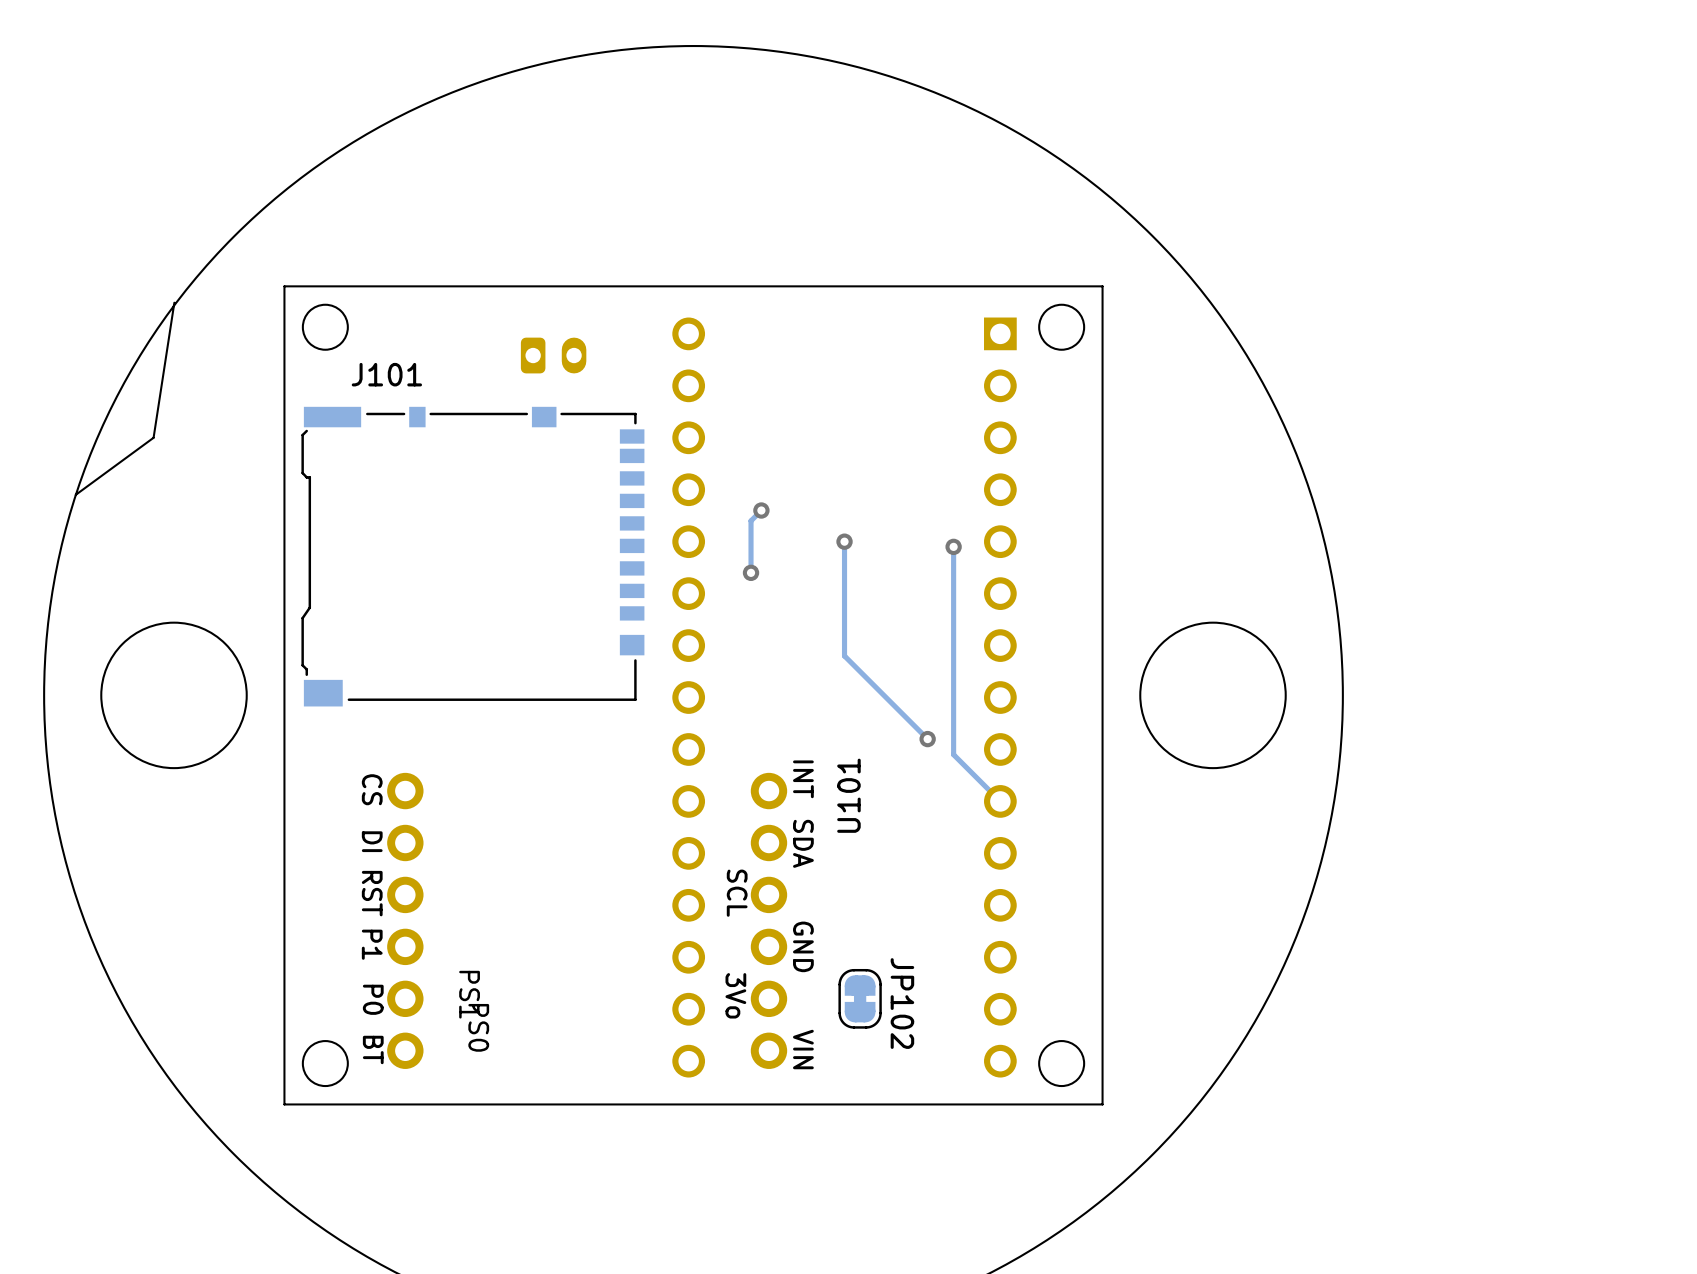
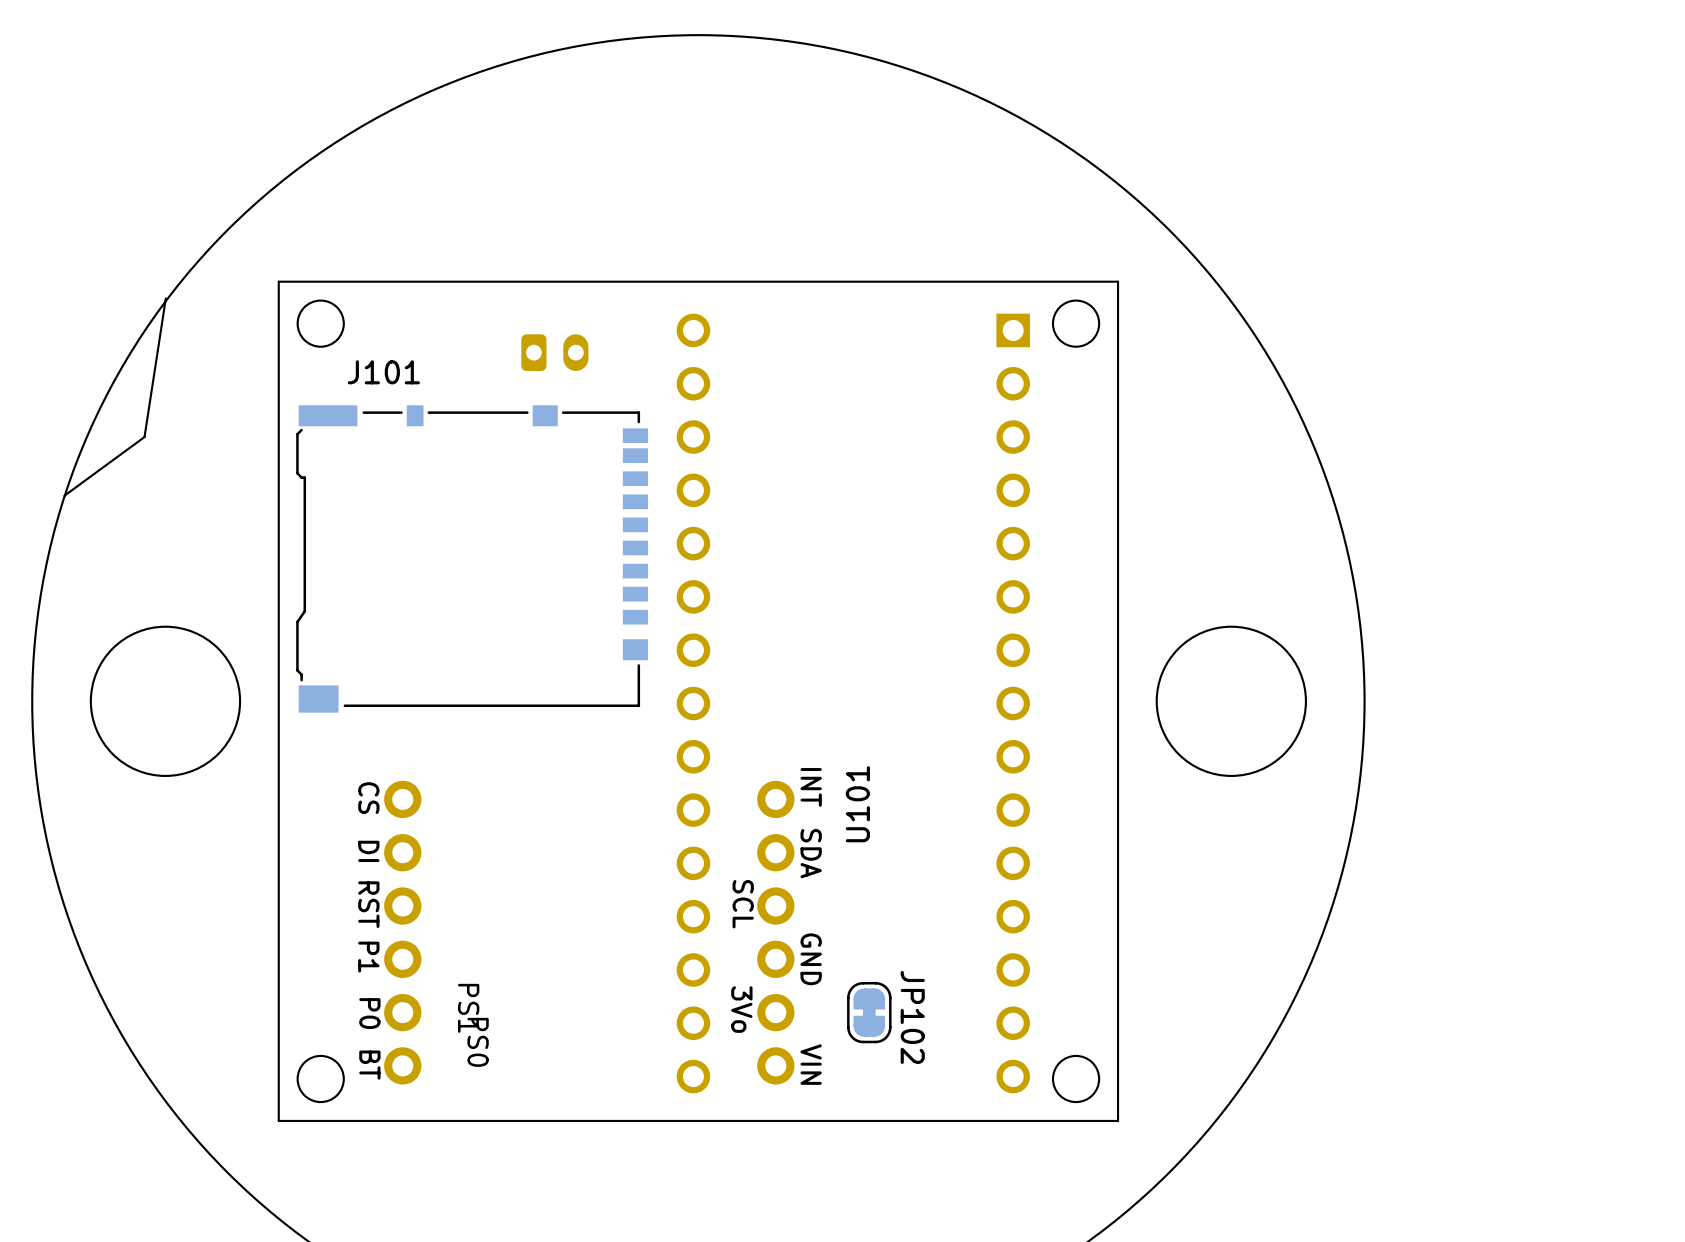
track: (761, 510) (751, 520) (751, 572) -> none
via: (761, 510) -> none
track: (844, 541) (844, 655) (927, 739) -> none
via: (844, 541) -> none
track: (953, 546) (953, 754) (1000, 801) -> none
via: (953, 546) -> none
via: (751, 572) -> none
via: (927, 739) -> none

